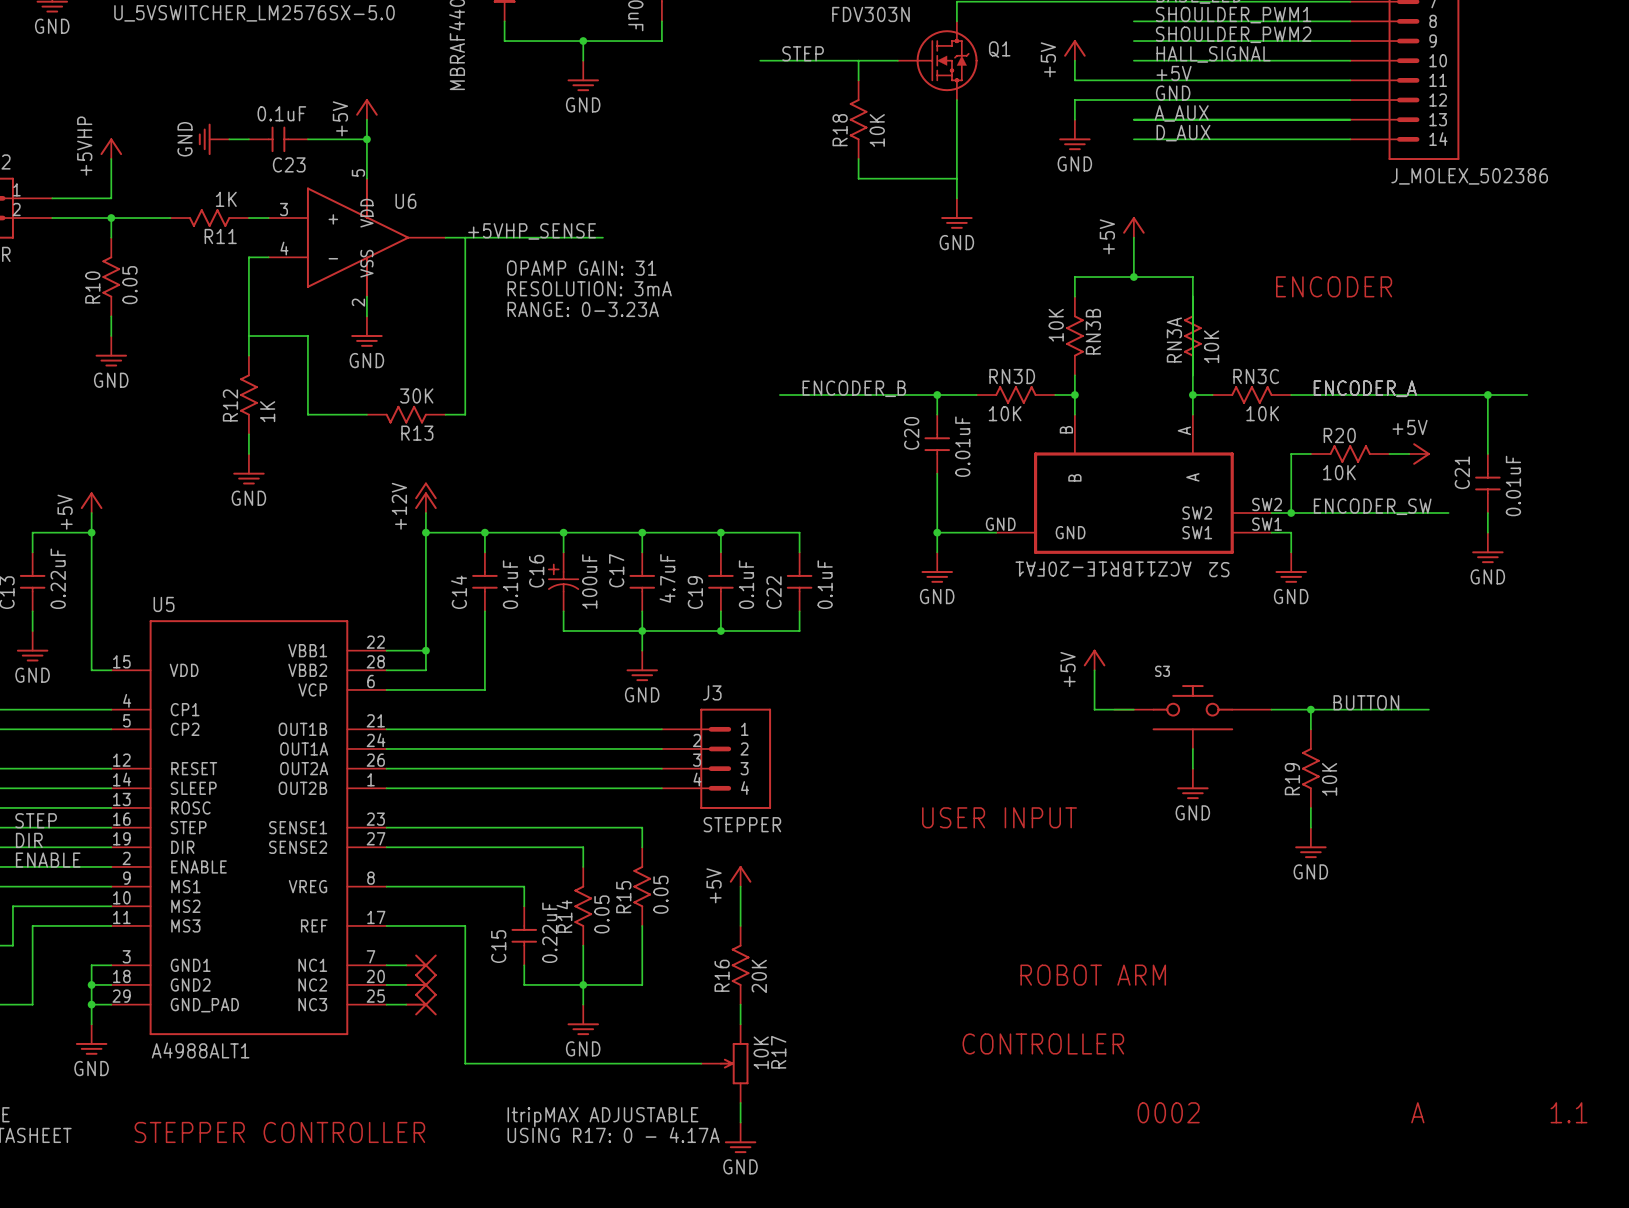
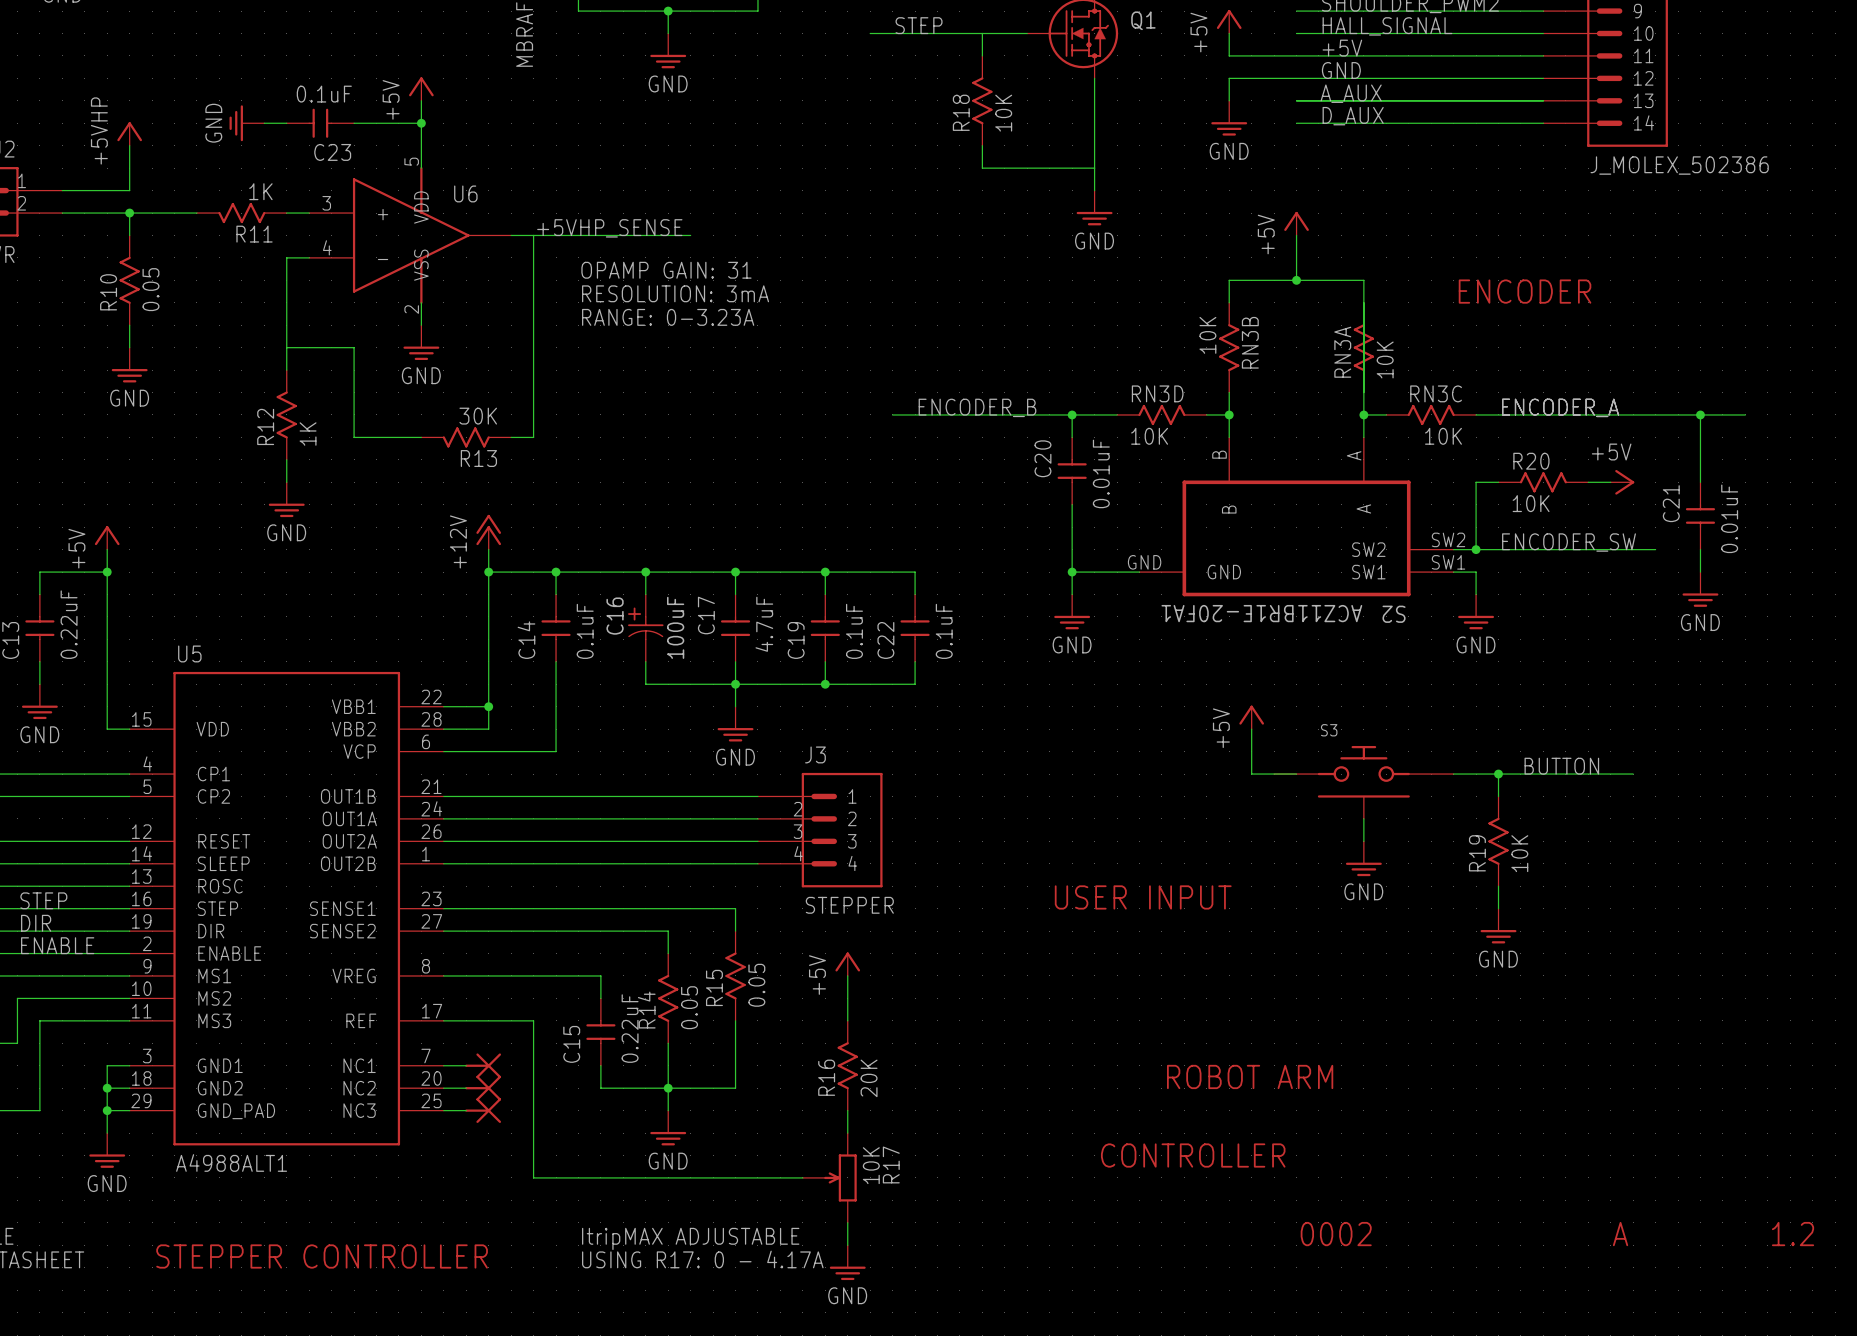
text: 1.1 (1568, 1112) -> 1.2 (1793, 1234)

